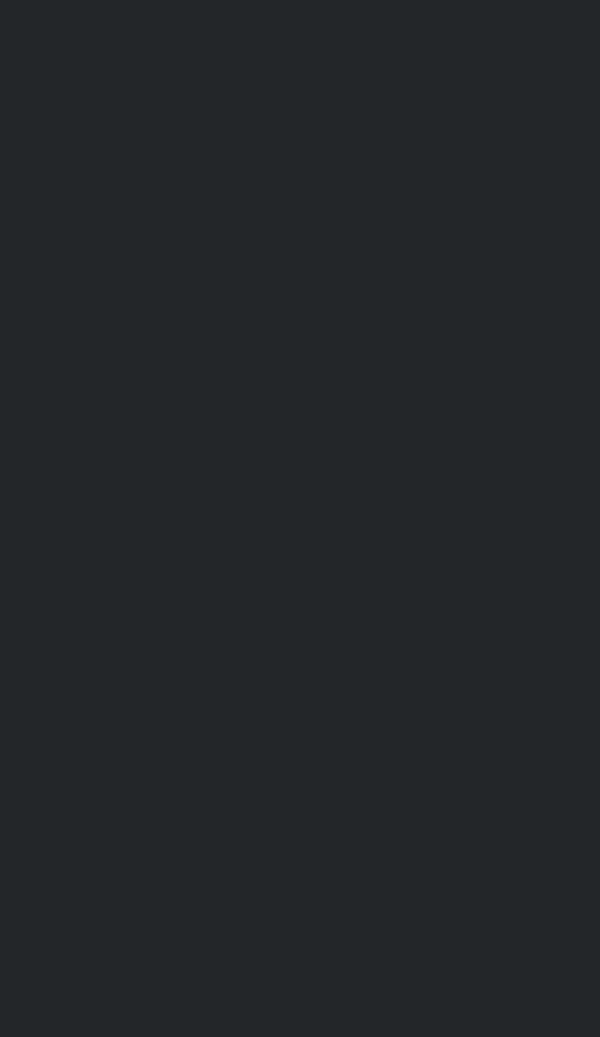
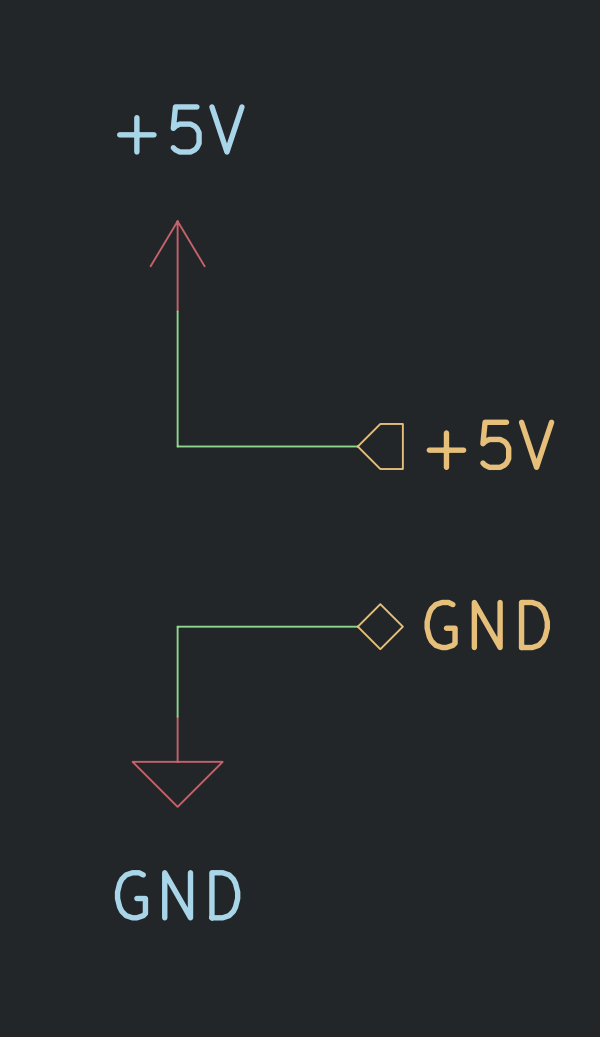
power symbol: none -> +5V (177, 266)
wire: none -> (177, 311) (177, 446) (357, 446)
hierarchical label: none -> +5V (490, 444)
hierarchical label: none -> GND (487, 625)
wire: none -> (357, 626) (177, 626) (177, 716)
power symbol: none -> GND (177, 761)

